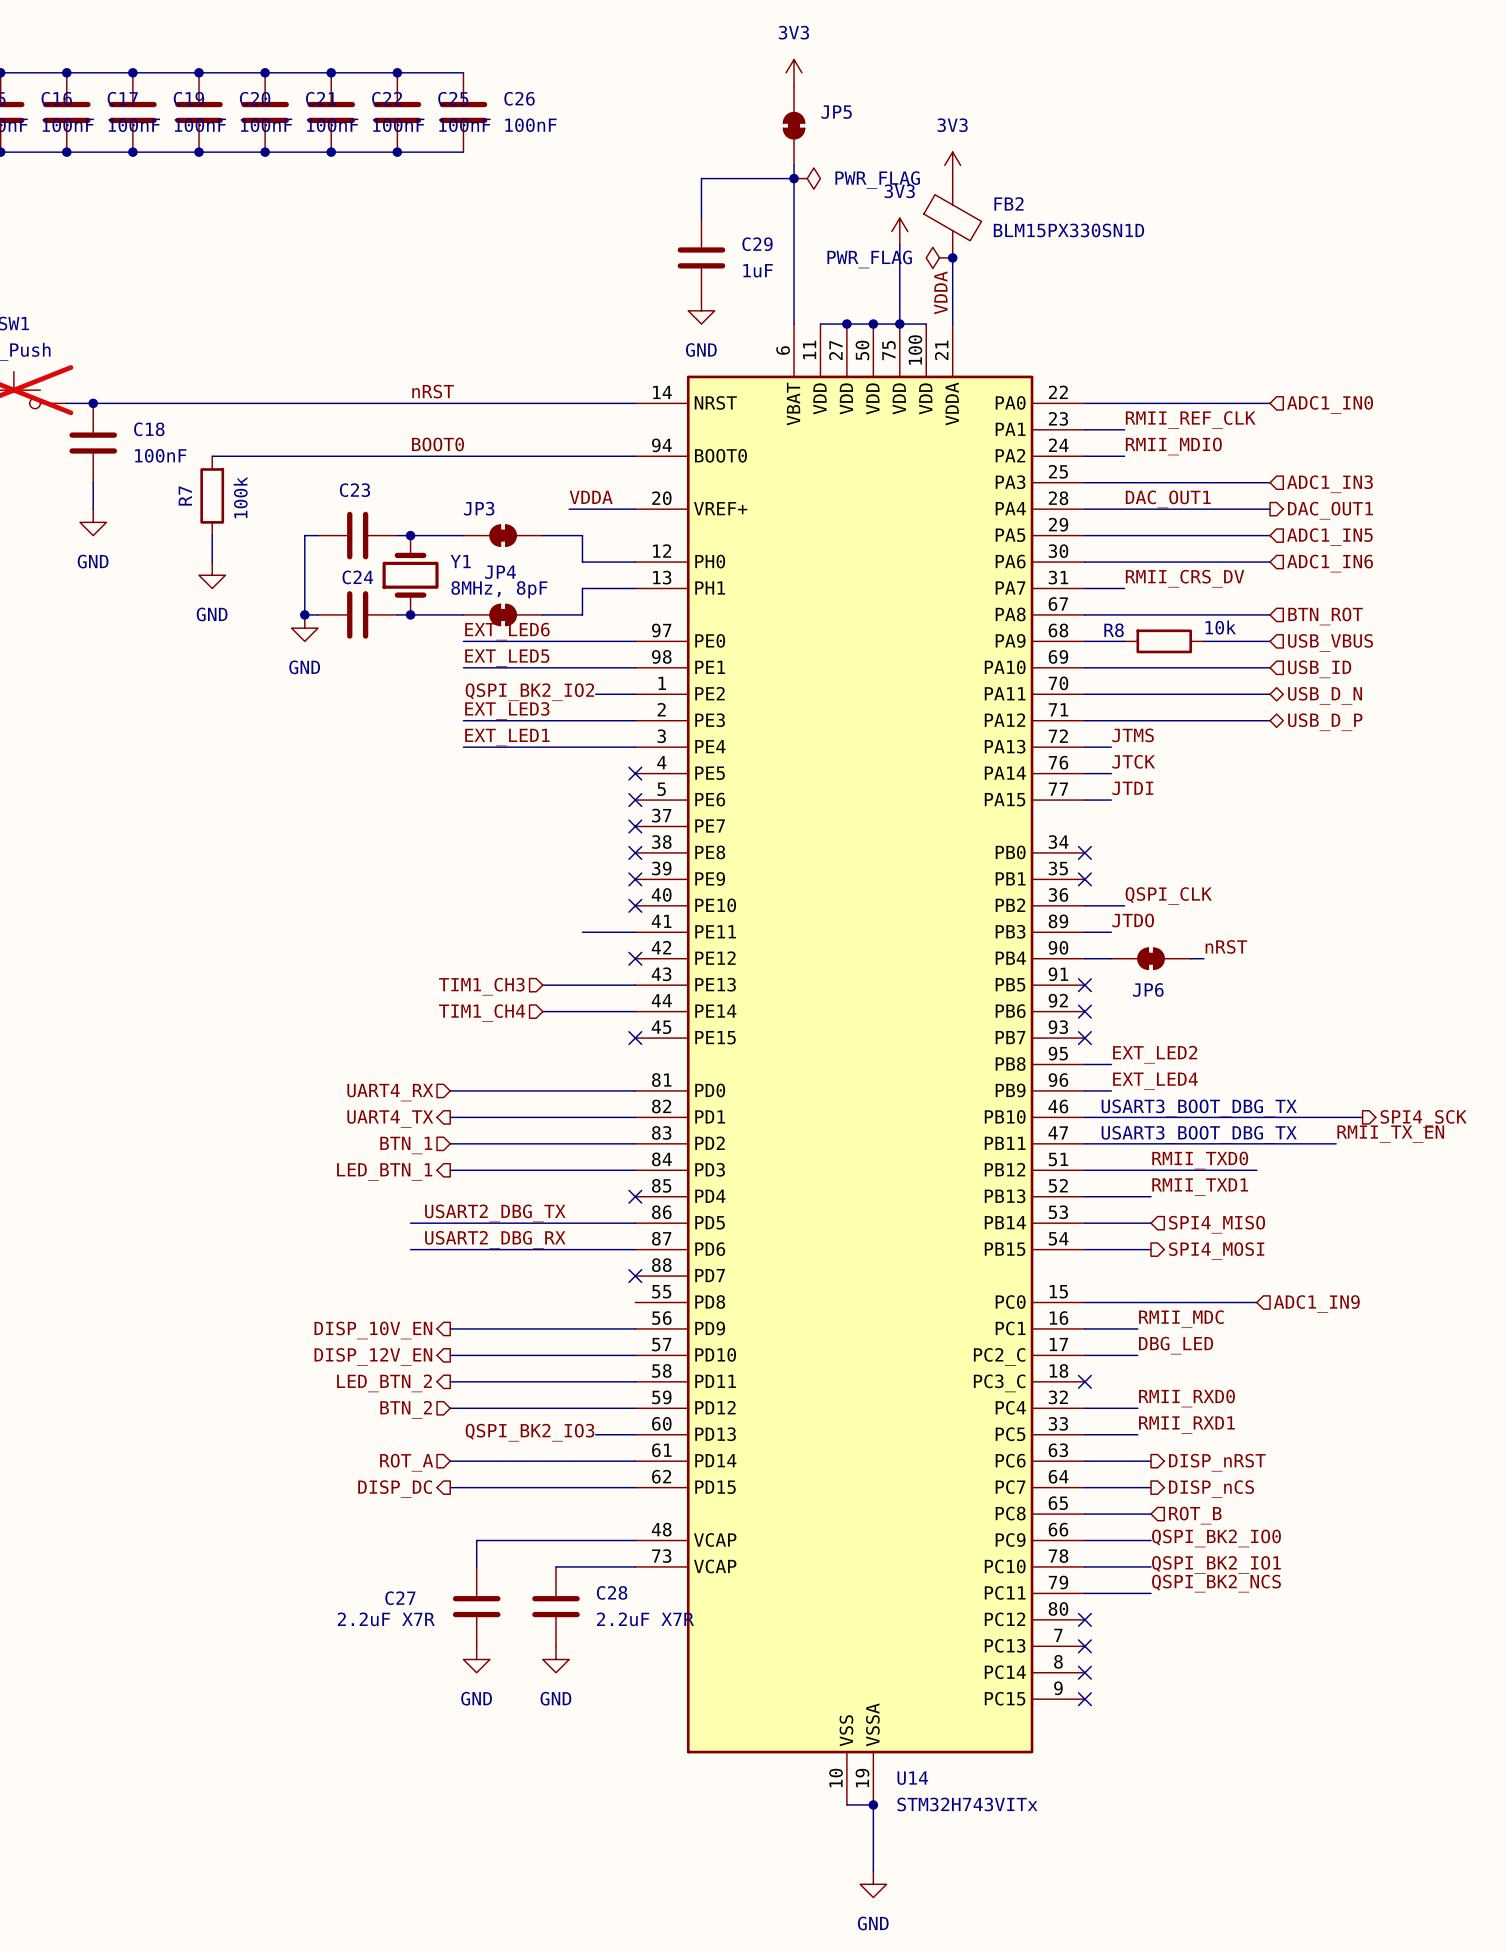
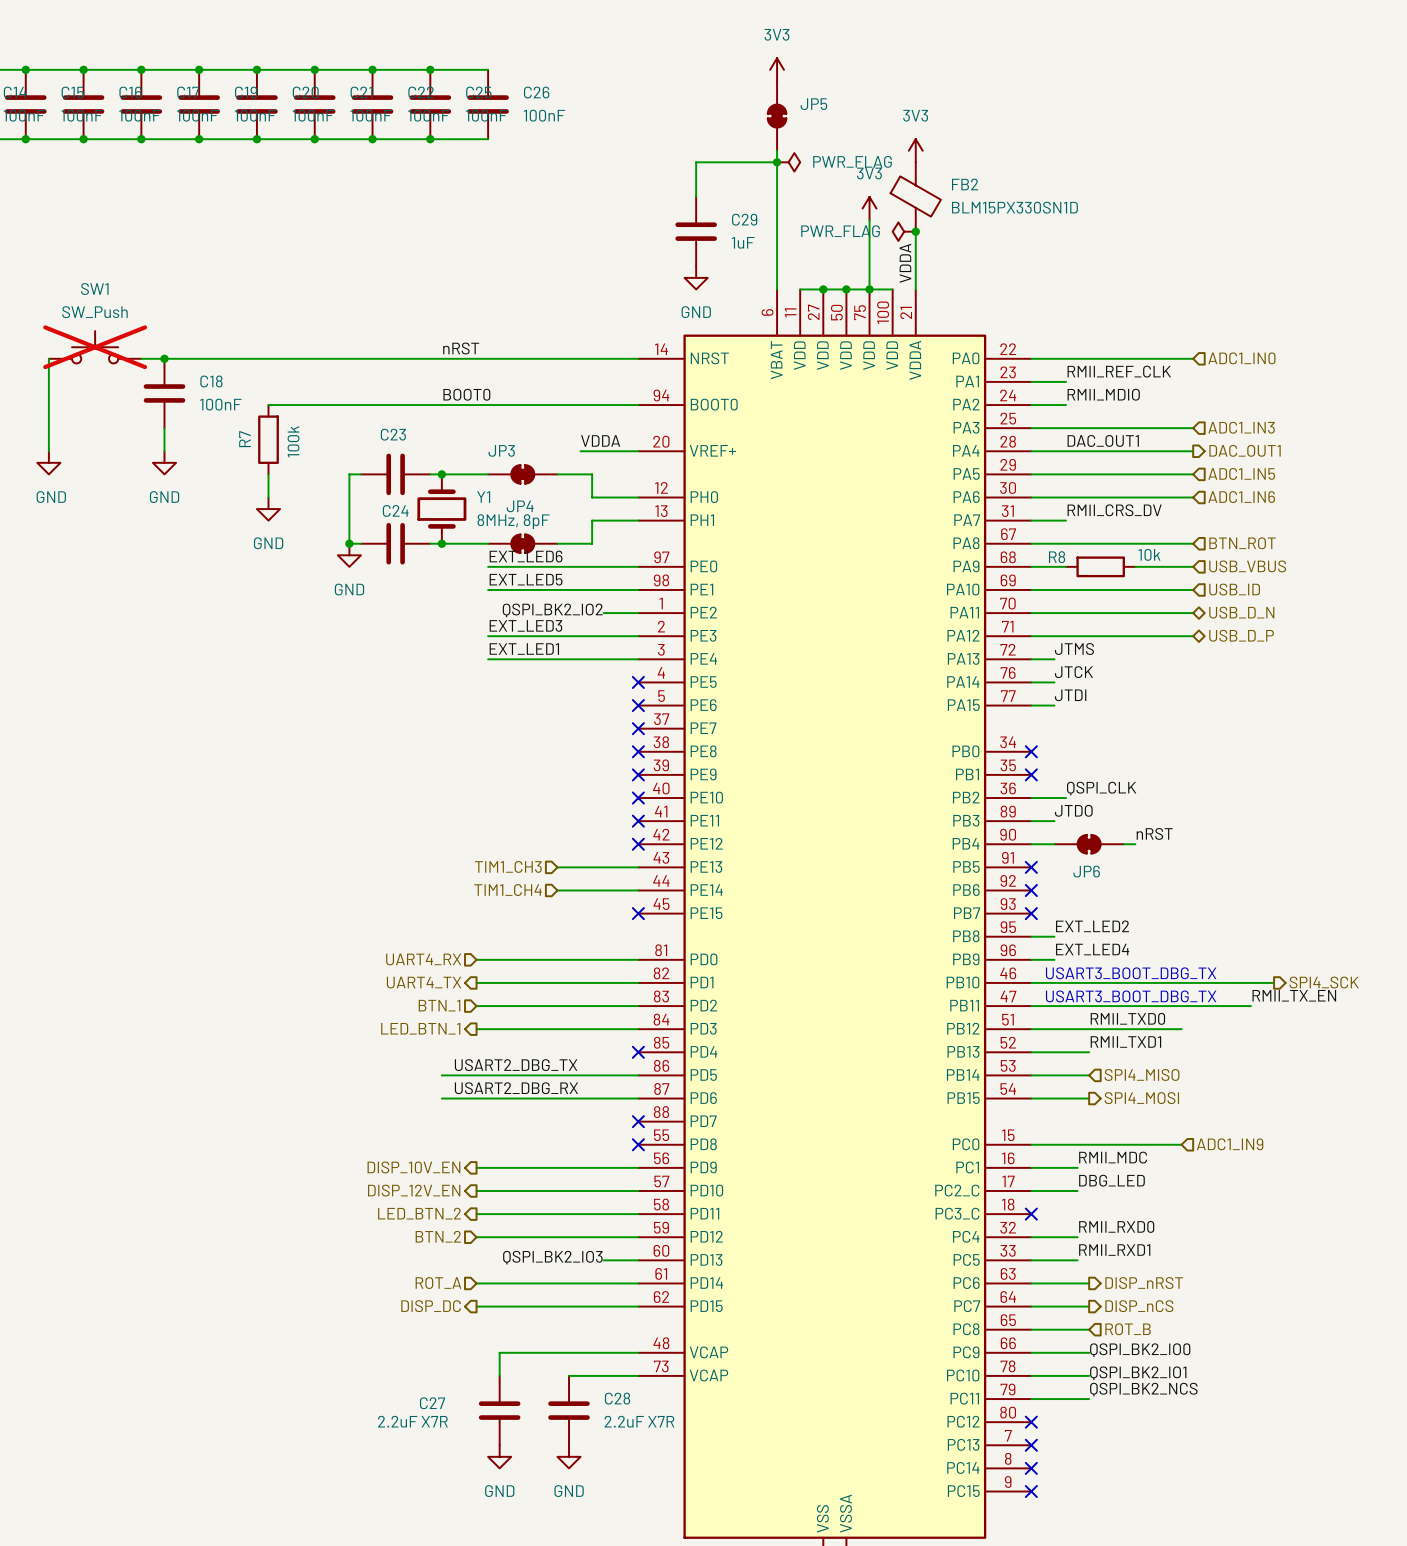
wire: (582, 932) (635, 932) -> none
no-connect mark: none -> (638, 821)
no-connect mark: none -> (638, 1144)

